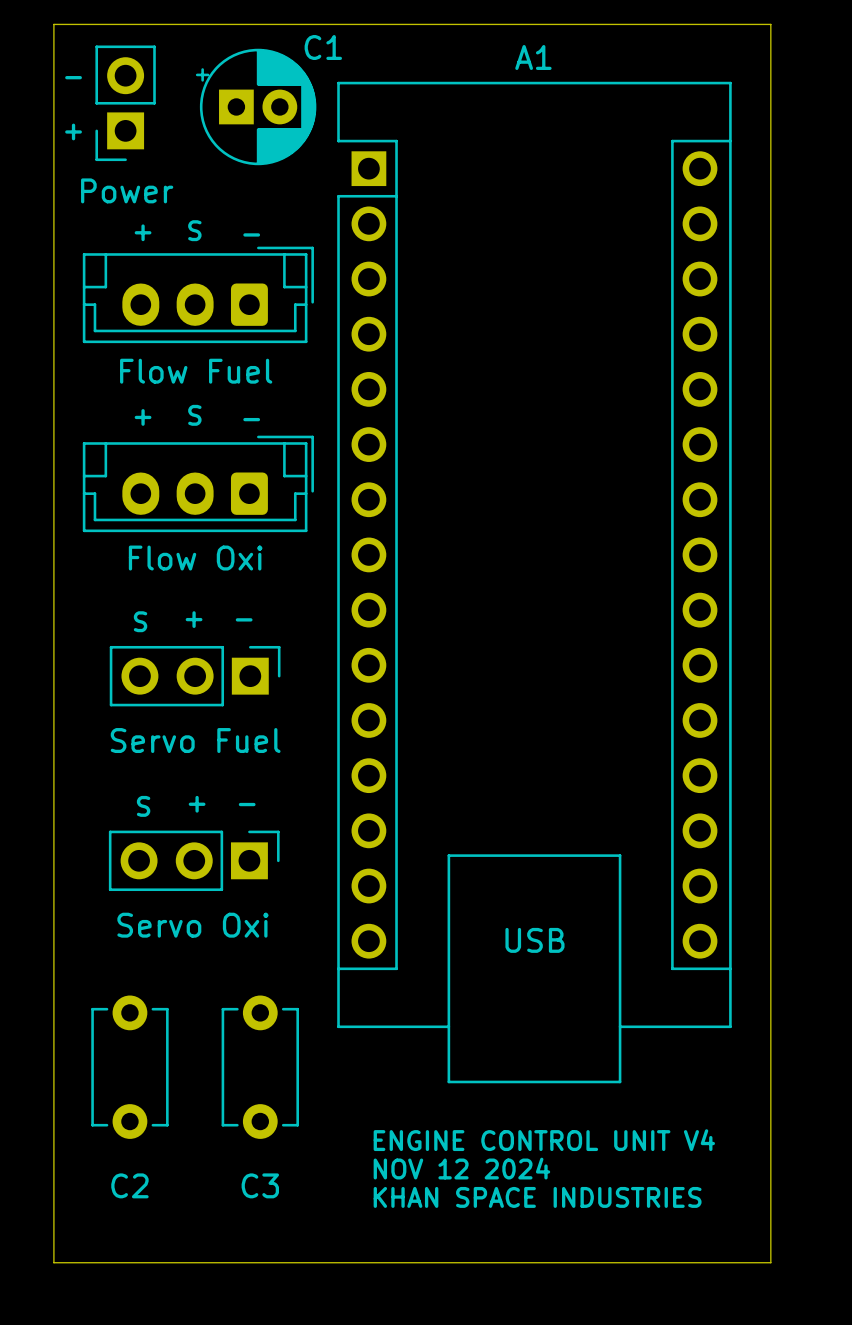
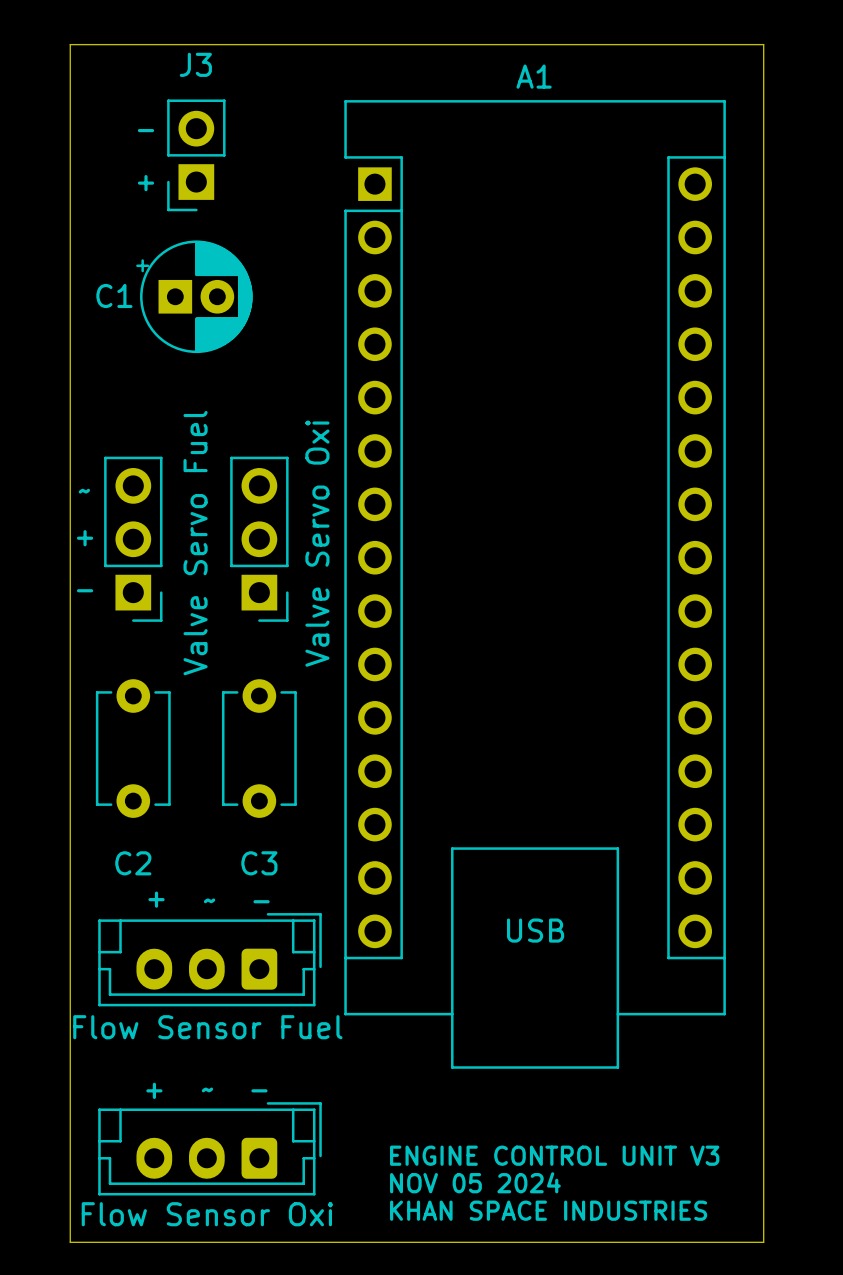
C1 name position: C1 (323, 47) -> C1 (114, 295)
text position: - (73, 77) -> - (145, 130)
Power: (125, 103) -> none
C1 position: (256, 106) -> (194, 296)
text: + (73, 131) -> none
J3: none -> (196, 155)
text: none -> + (145, 183)
text: S (194, 230) -> none
text: + (143, 232) -> none
text: - (251, 234) -> none
Flow Fuel: (198, 294) -> none
text: S (194, 415) -> none
text: + (143, 417) -> none
text: - (251, 419) -> none
Flow Oxi: (198, 483) -> none
text: none -> ~ (84, 491)
text: none -> + (85, 538)
Valve Servo Fuel: none -> (133, 539)
Valve Servo Oxi: none -> (259, 539)
text: none -> - (85, 590)
text: + (194, 619) -> none
text: - (244, 619) -> none
text: S (140, 621) -> none
Servo Fuel: (195, 676) -> none
text rotation: 0° (197, 804) -> 90° clockwise (156, 899)
text position: + (197, 804) -> + (156, 899)
text rotation: 0° (247, 804) -> 180° (261, 901)
text position: - (247, 804) -> - (261, 901)
text: S (143, 806) -> none
Servo Oxi: (194, 860) -> none
text: none -> ~ (209, 900)
Flow Sensor Fuel: none -> (210, 959)
C2 position: (129, 1067) -> (133, 748)
C3 position: (260, 1067) -> (259, 748)
text: none -> ~ (207, 1089)
text: none -> + (154, 1090)
text: none -> - (259, 1090)
text: ENGINE CONTROL UNIT V4 (544, 1140) -> none
Flow Sensor Oxi: none -> (210, 1148)
text: NOV 12 2024 (461, 1168) -> ENGINE CONTROL UNIT V3 (554, 1155)
text position: KHAN SPACE INDUSTRIES (537, 1197) -> KHAN SPACE INDUSTRIES (548, 1210)
text: none -> NOV 05 2024 (475, 1182)

